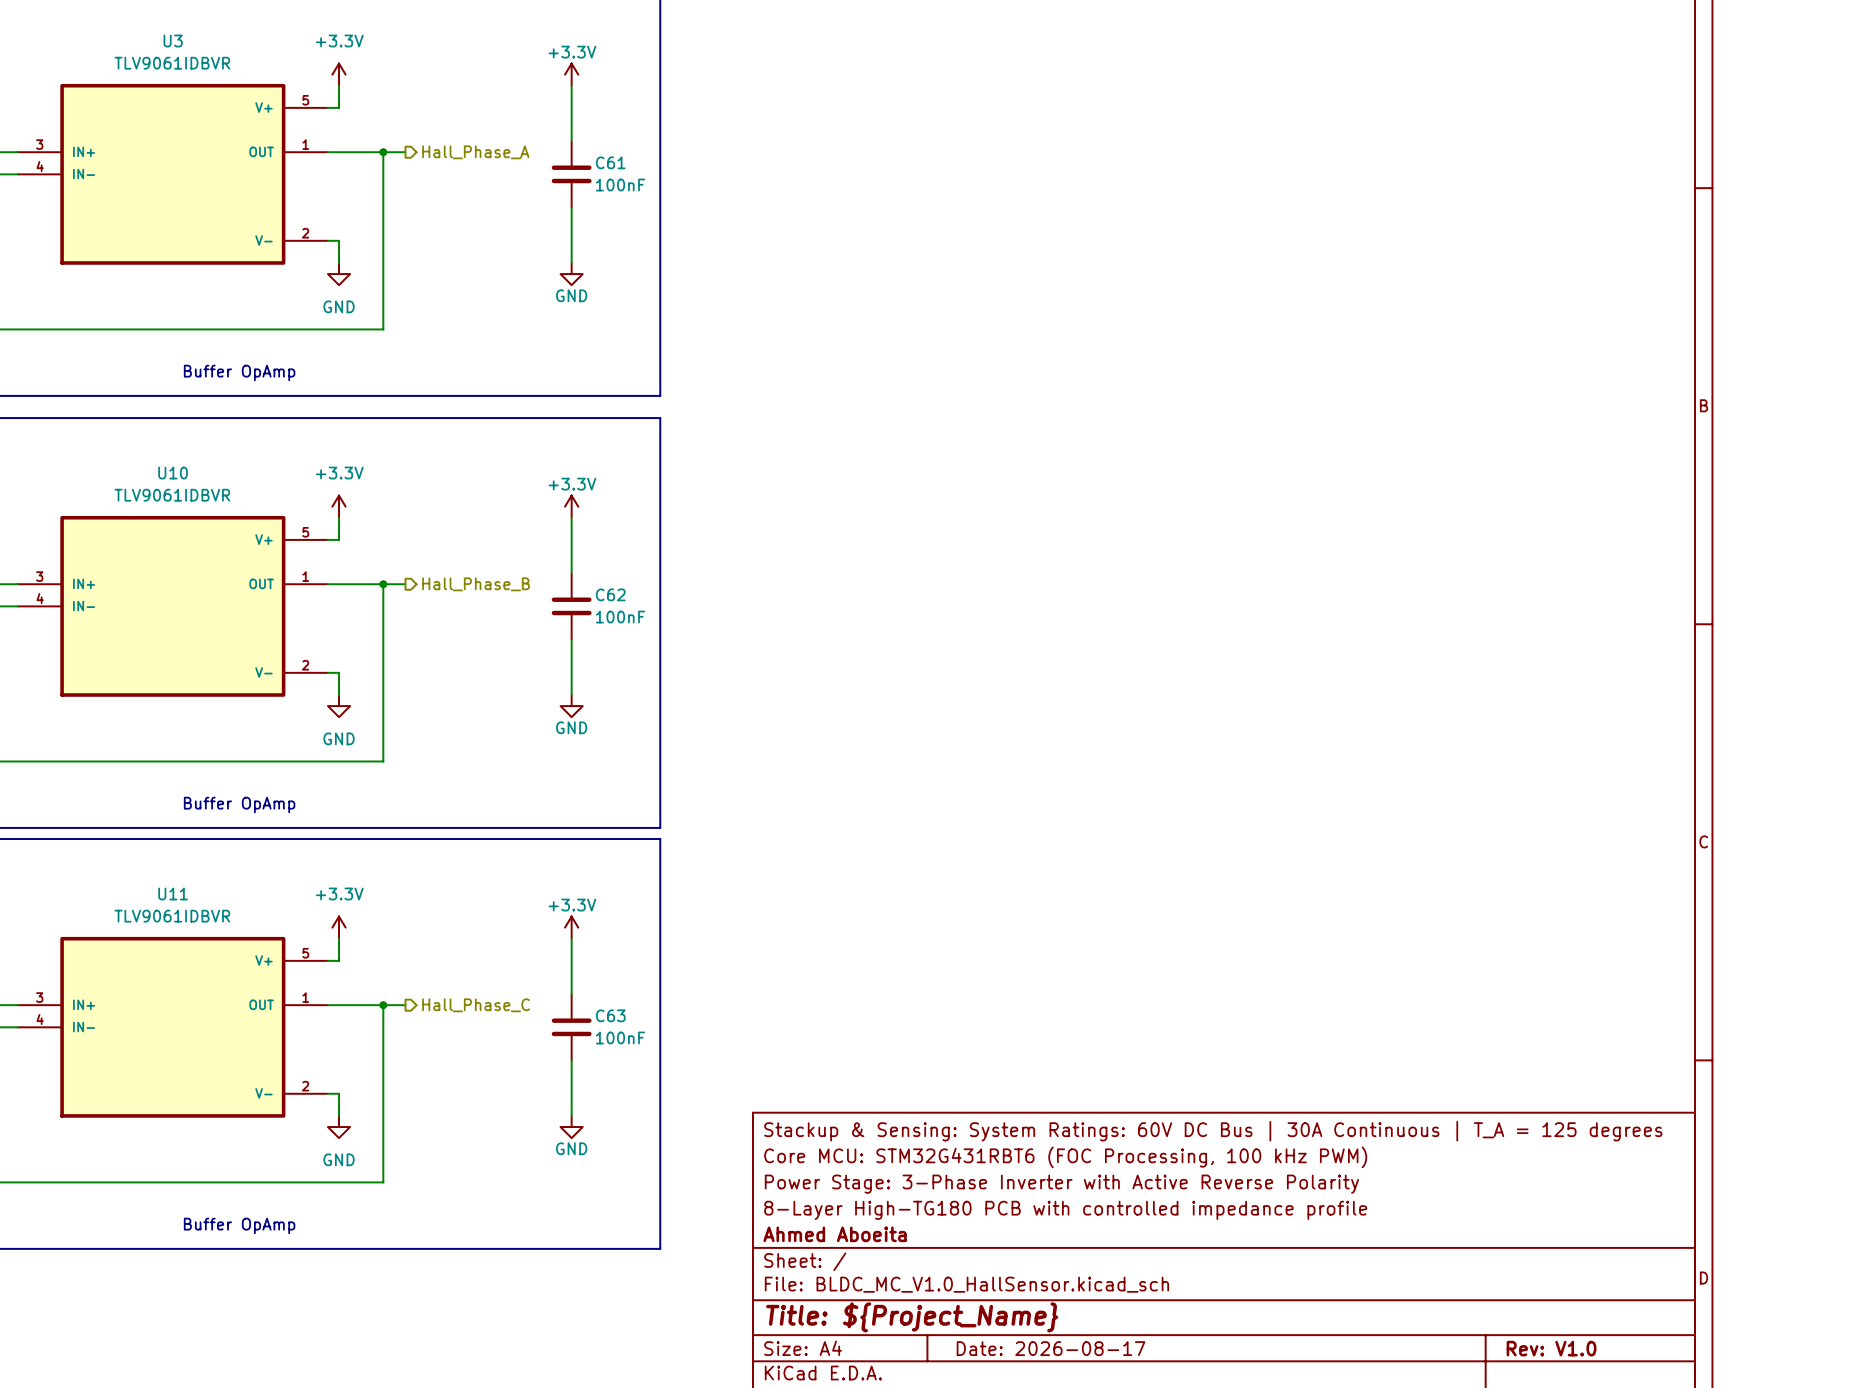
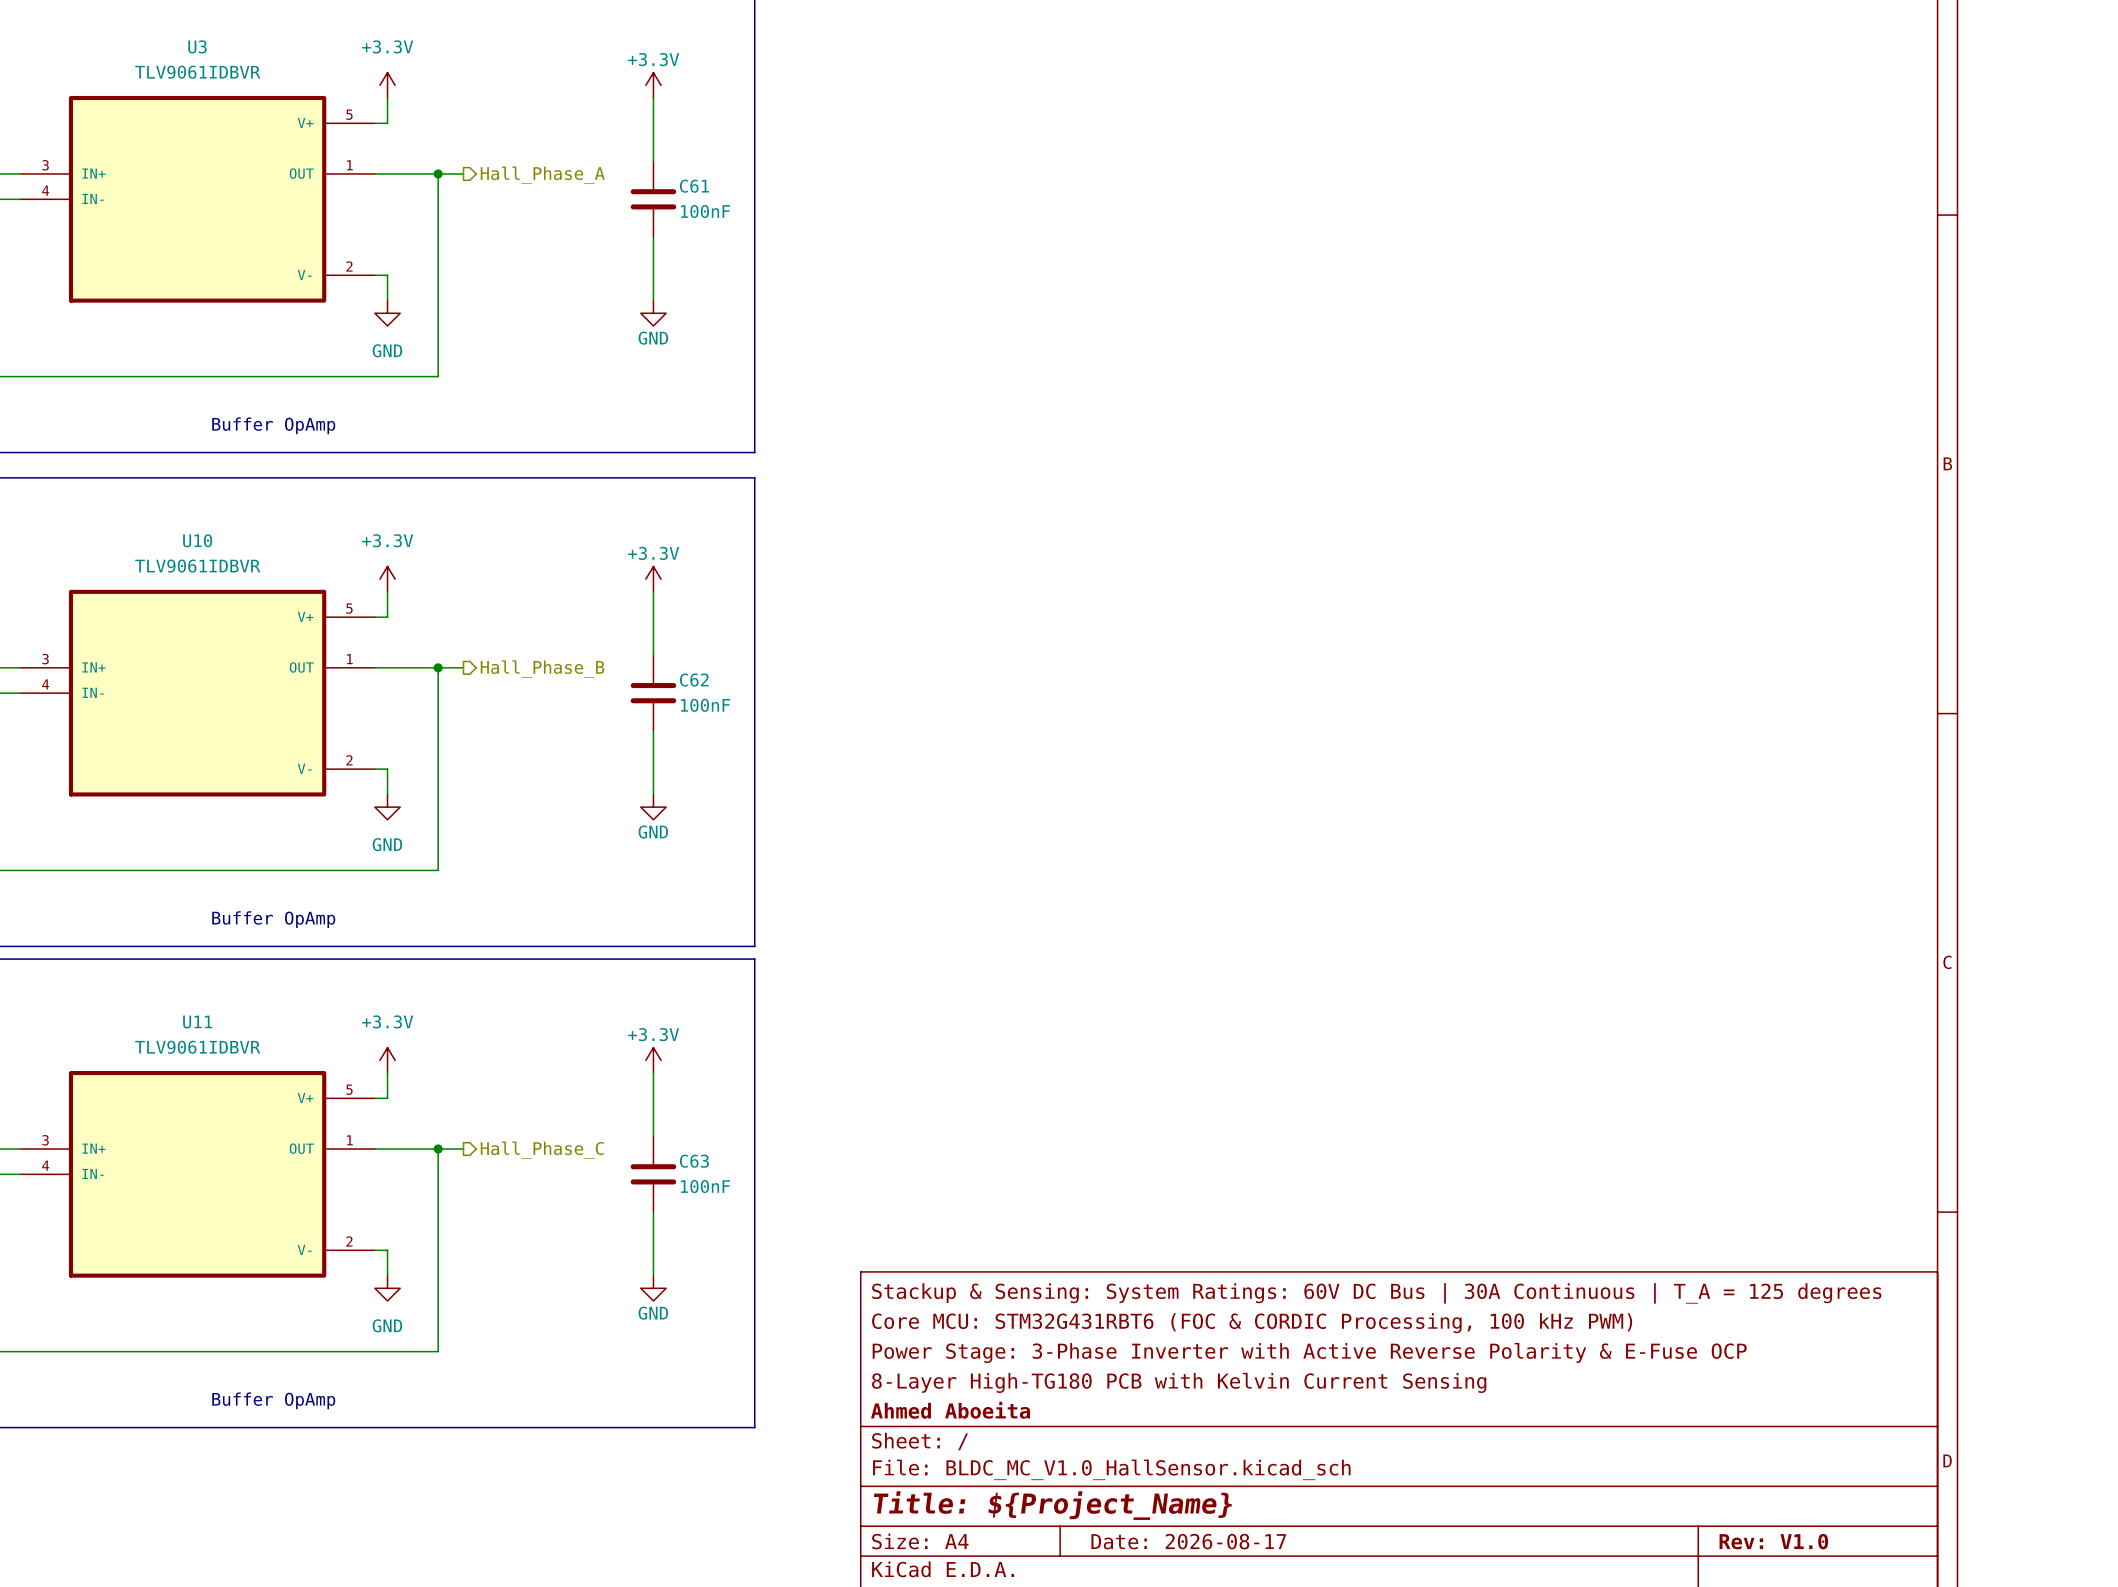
title block: Core MCU: STM32G431RBT6 (FOC Processing, 100 kHz PWM) (1065, 1157) -> Core MCU: STM32G431RBT6 (FOC & CORDIC Processing, 100 kHz PWM) (1252, 1323)
title block: Power Stage: 3-Phase Inverter with Active Reverse Polarity (1061, 1184) -> Power Stage: 3-Phase Inverter with Active Reverse Polarity & E-Fuse OCP (1309, 1352)
title block: 8-Layer High-TG180 PCB with controlled impedance profile (1065, 1210) -> 8-Layer High-TG180 PCB with Kelvin Current Sensing (1179, 1382)

